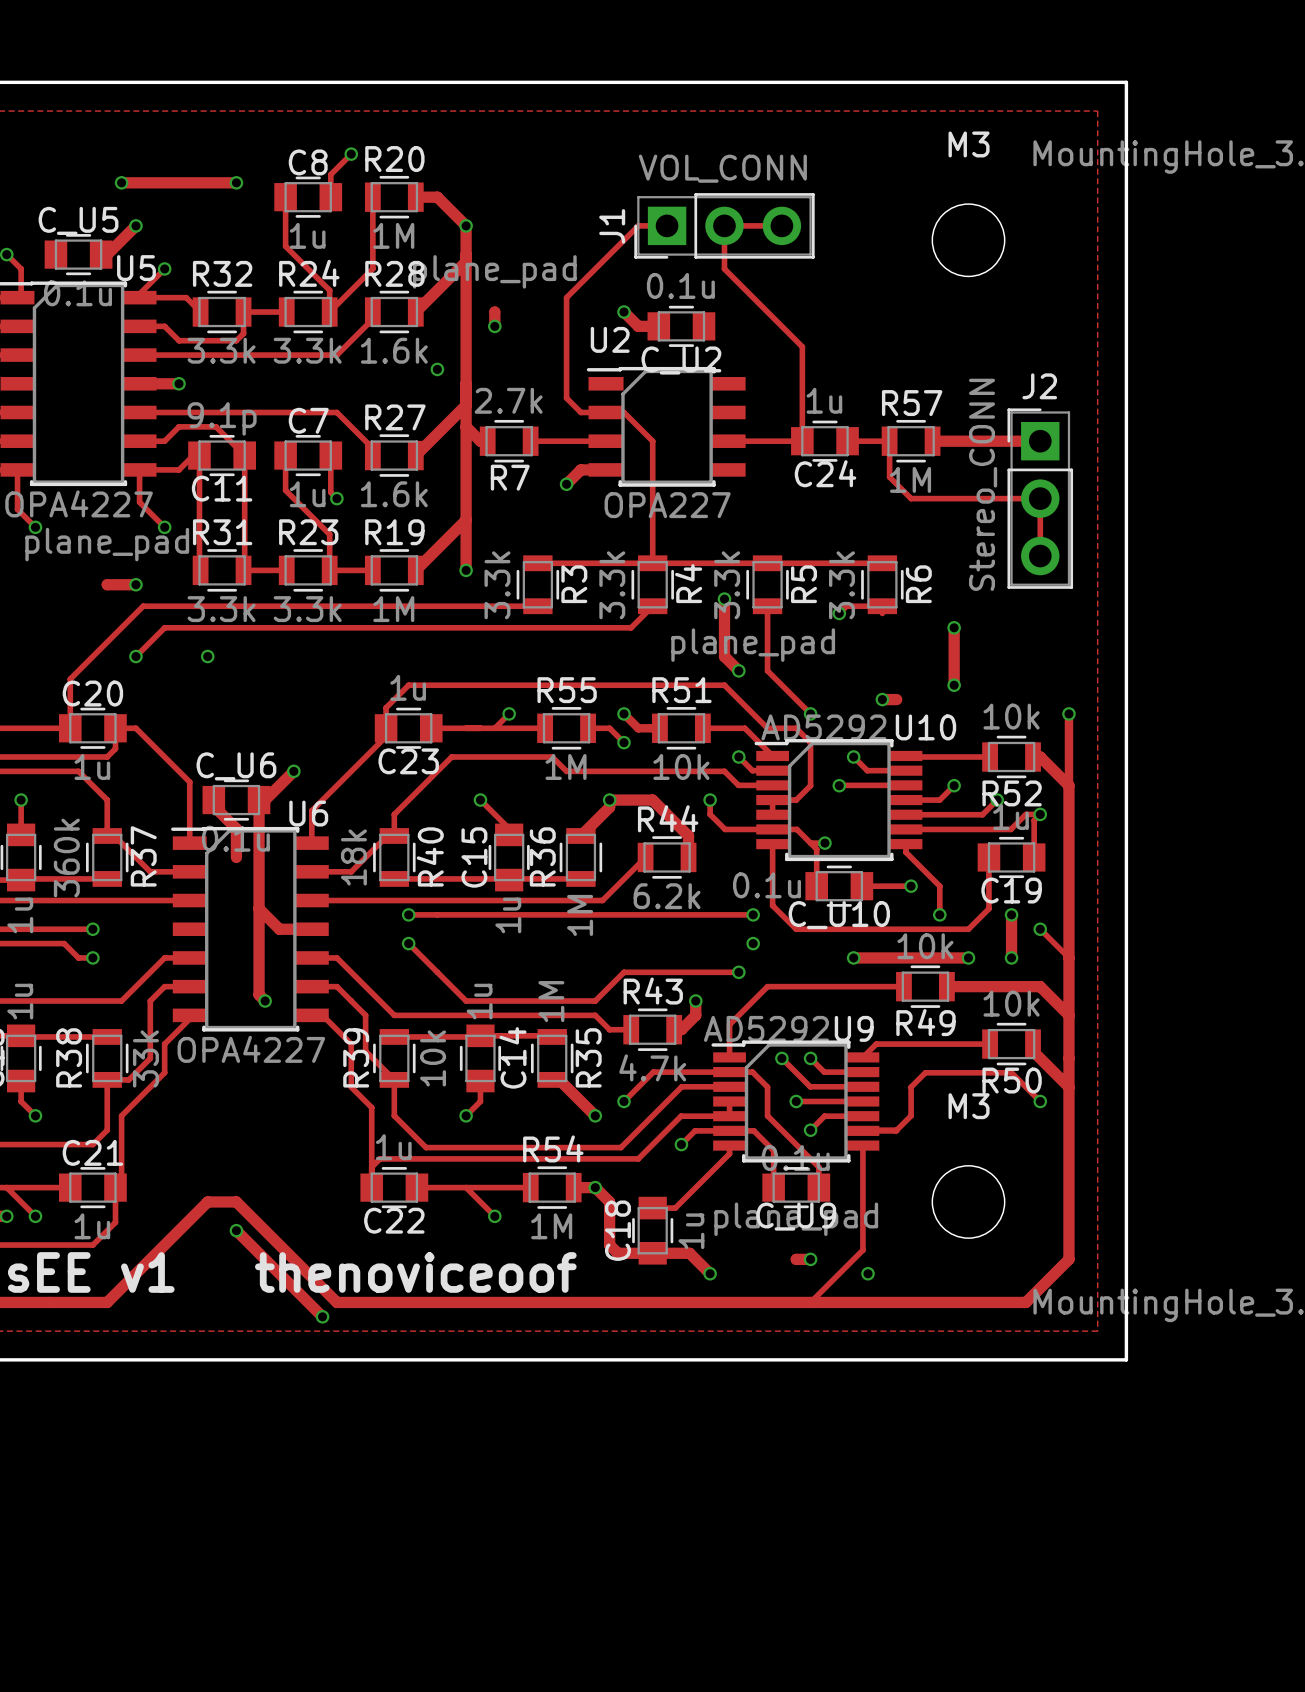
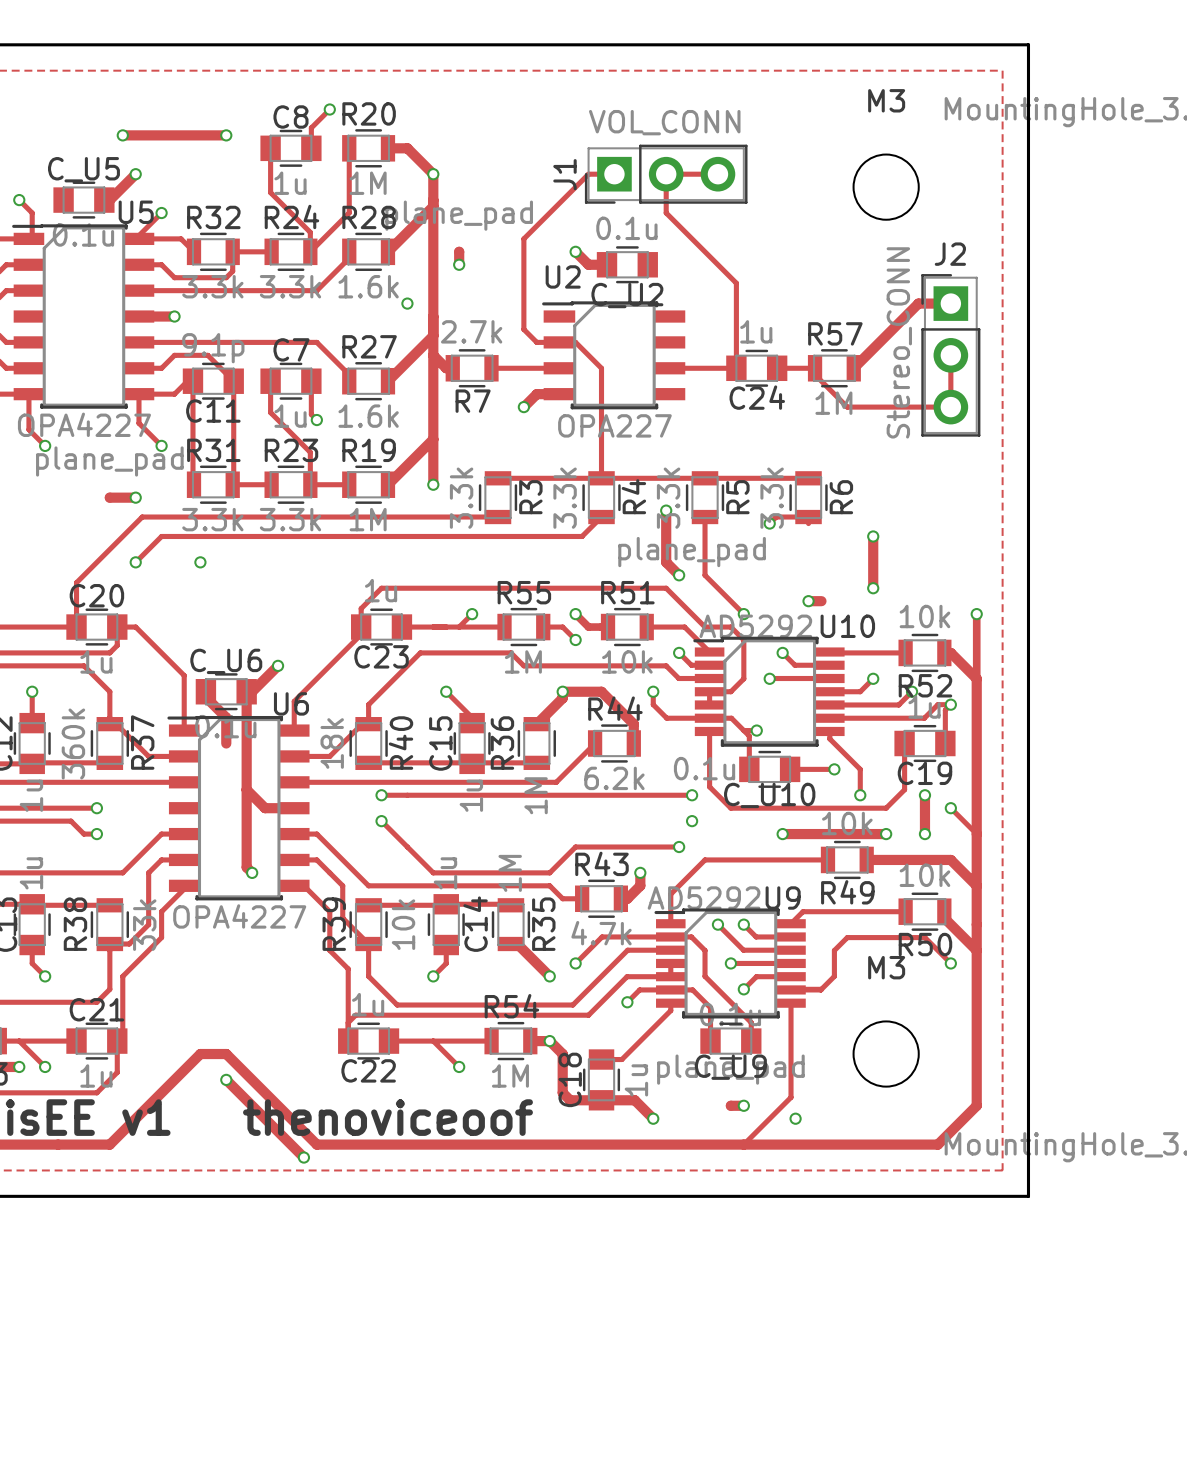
track: (932, 441) (1040, 441) -> (853, 368) (918, 303) (950, 303)
track: (889, 448) (889, 477) (911, 498) (1040, 498) (1040, 556) -> (815, 374) (847, 407) (950, 407) (950, 355)
J2 position: (1040, 498) -> (950, 355)

